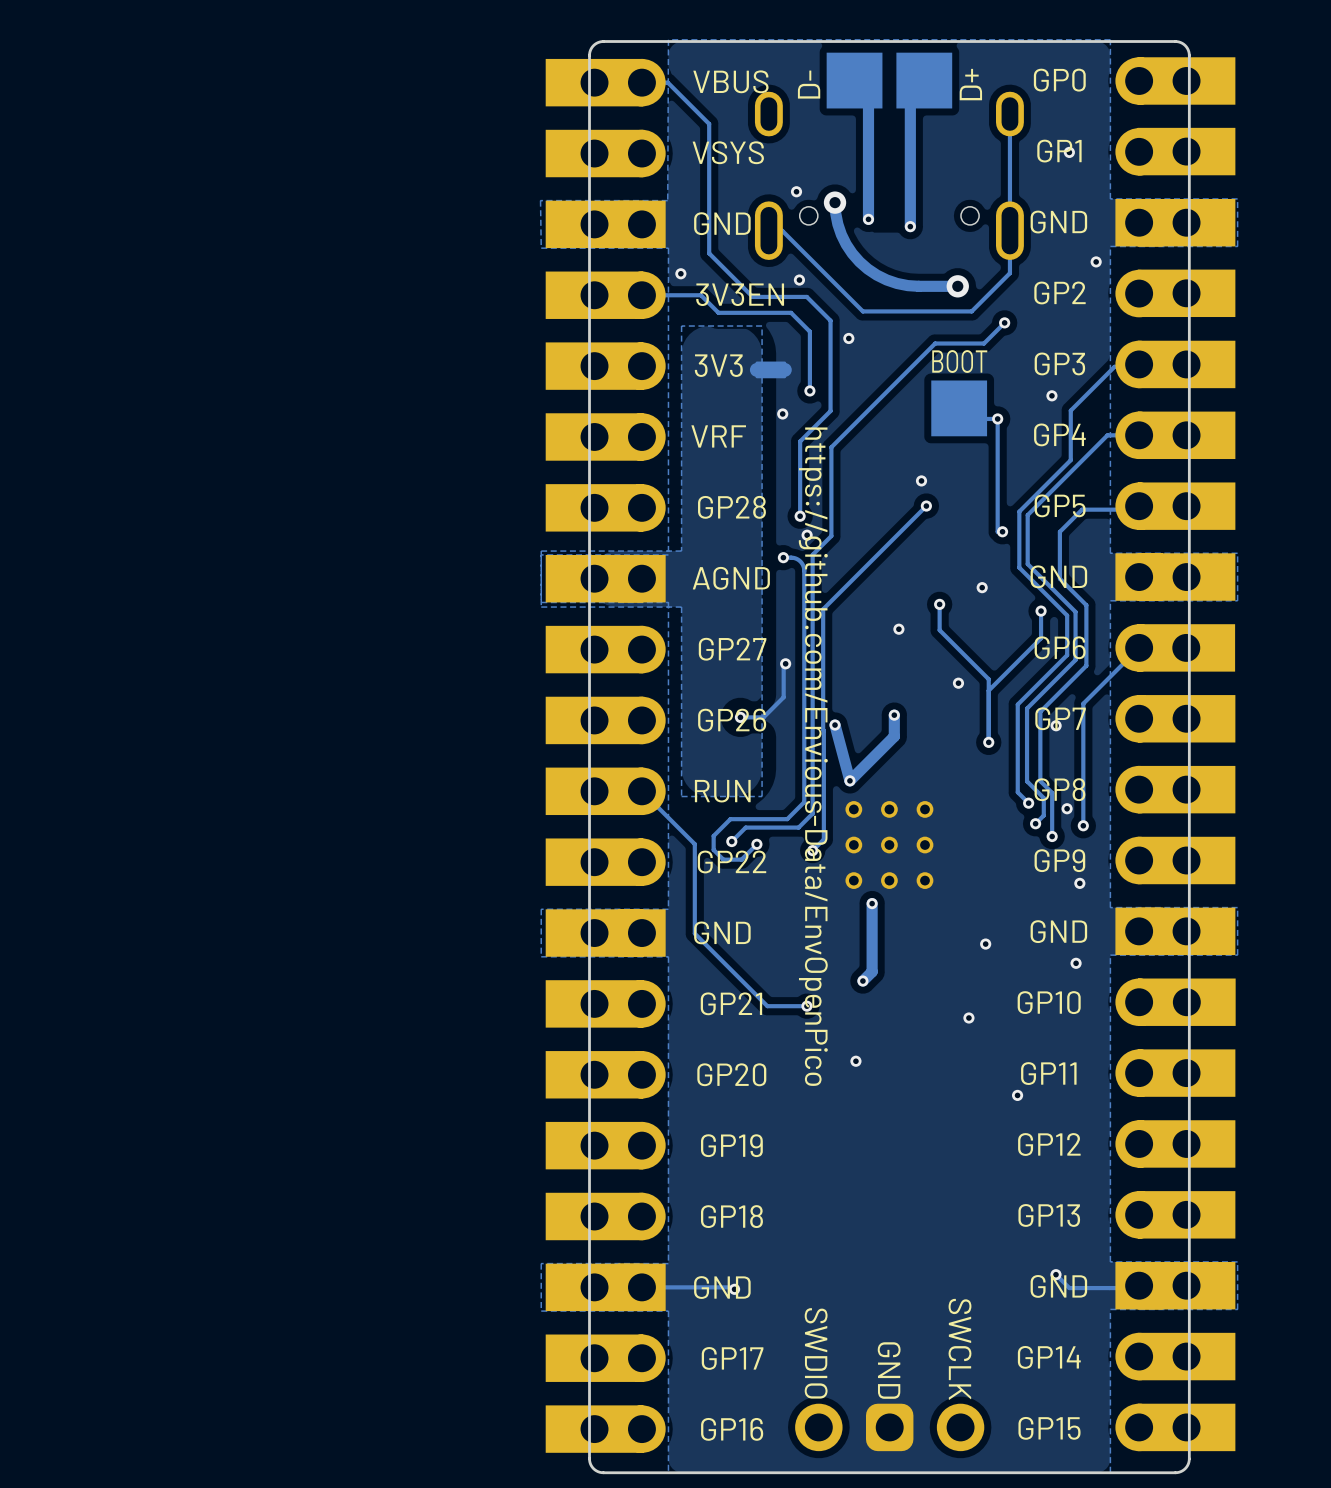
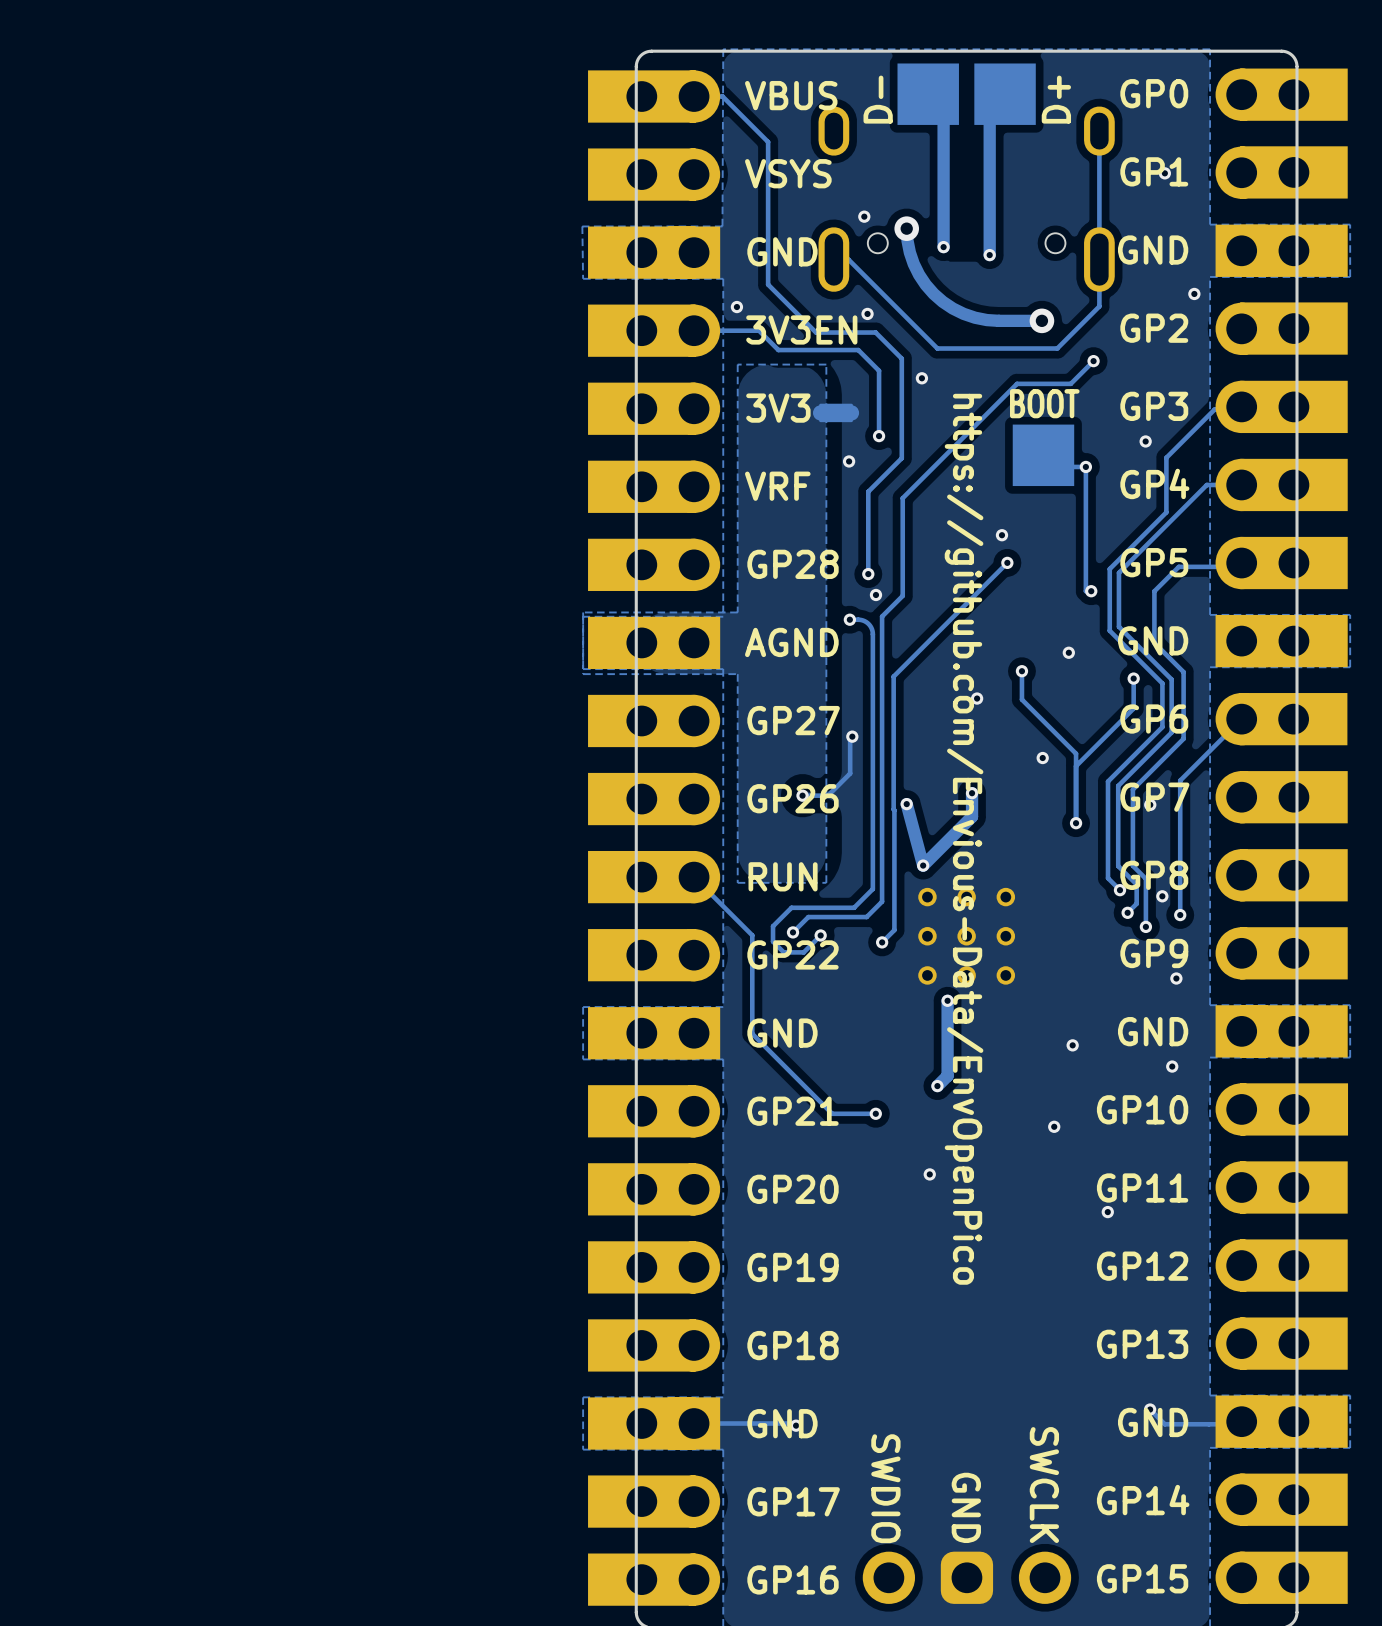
text position: https://github.com/Envious-Data/EnvOpenPico (813, 756) -> https://github.com/Envious-Data/EnvOpenPico (964, 839)

